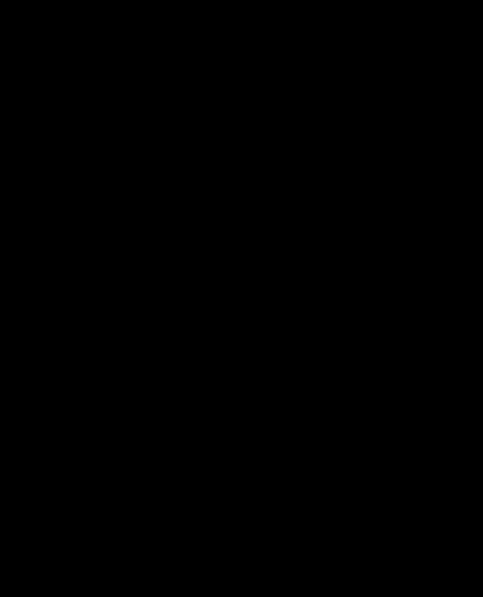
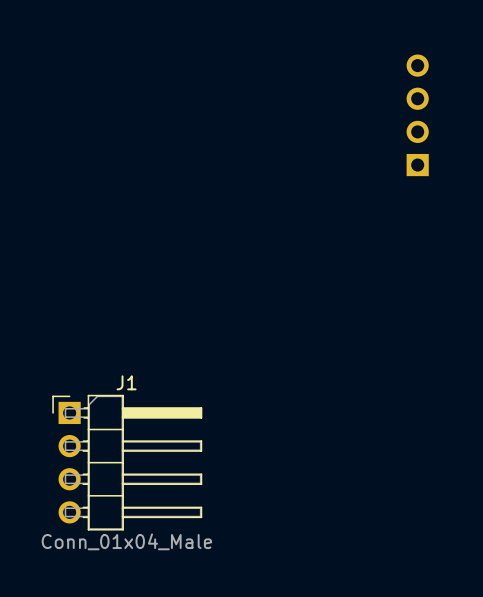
part: none -> (417, 115)
J1: none -> Conn_01x04_Male (127, 462)

